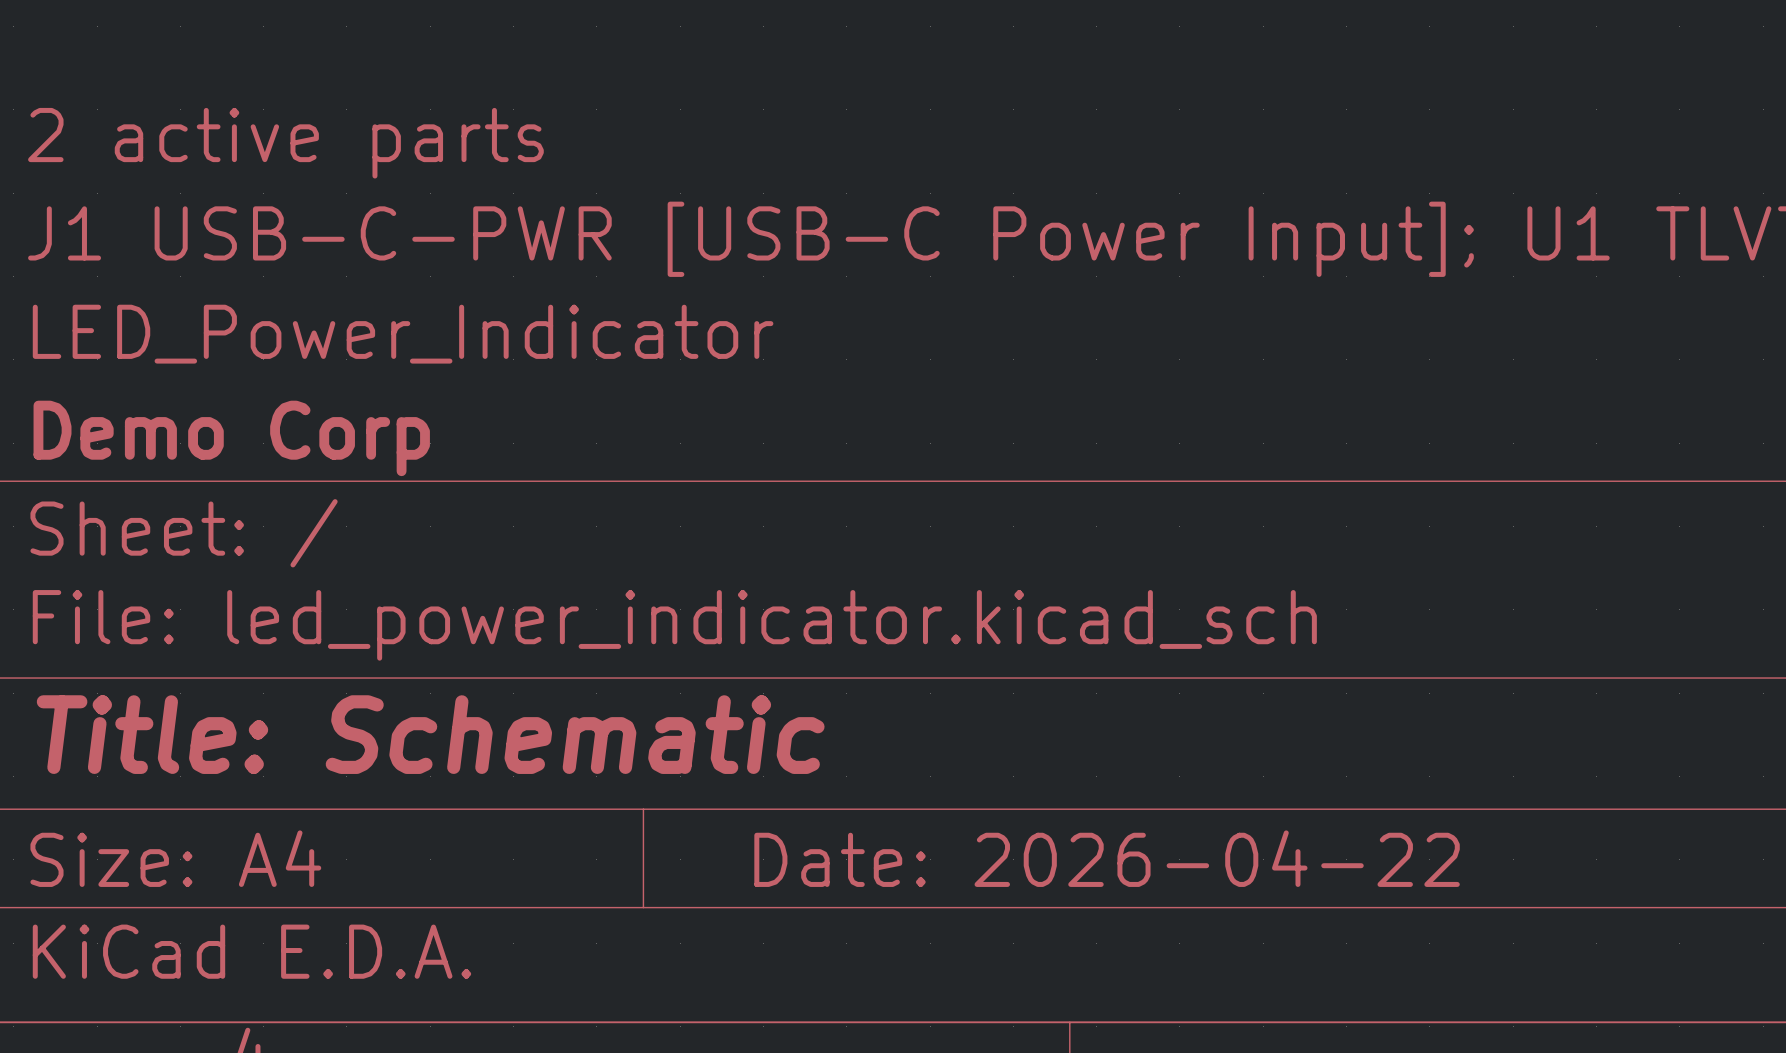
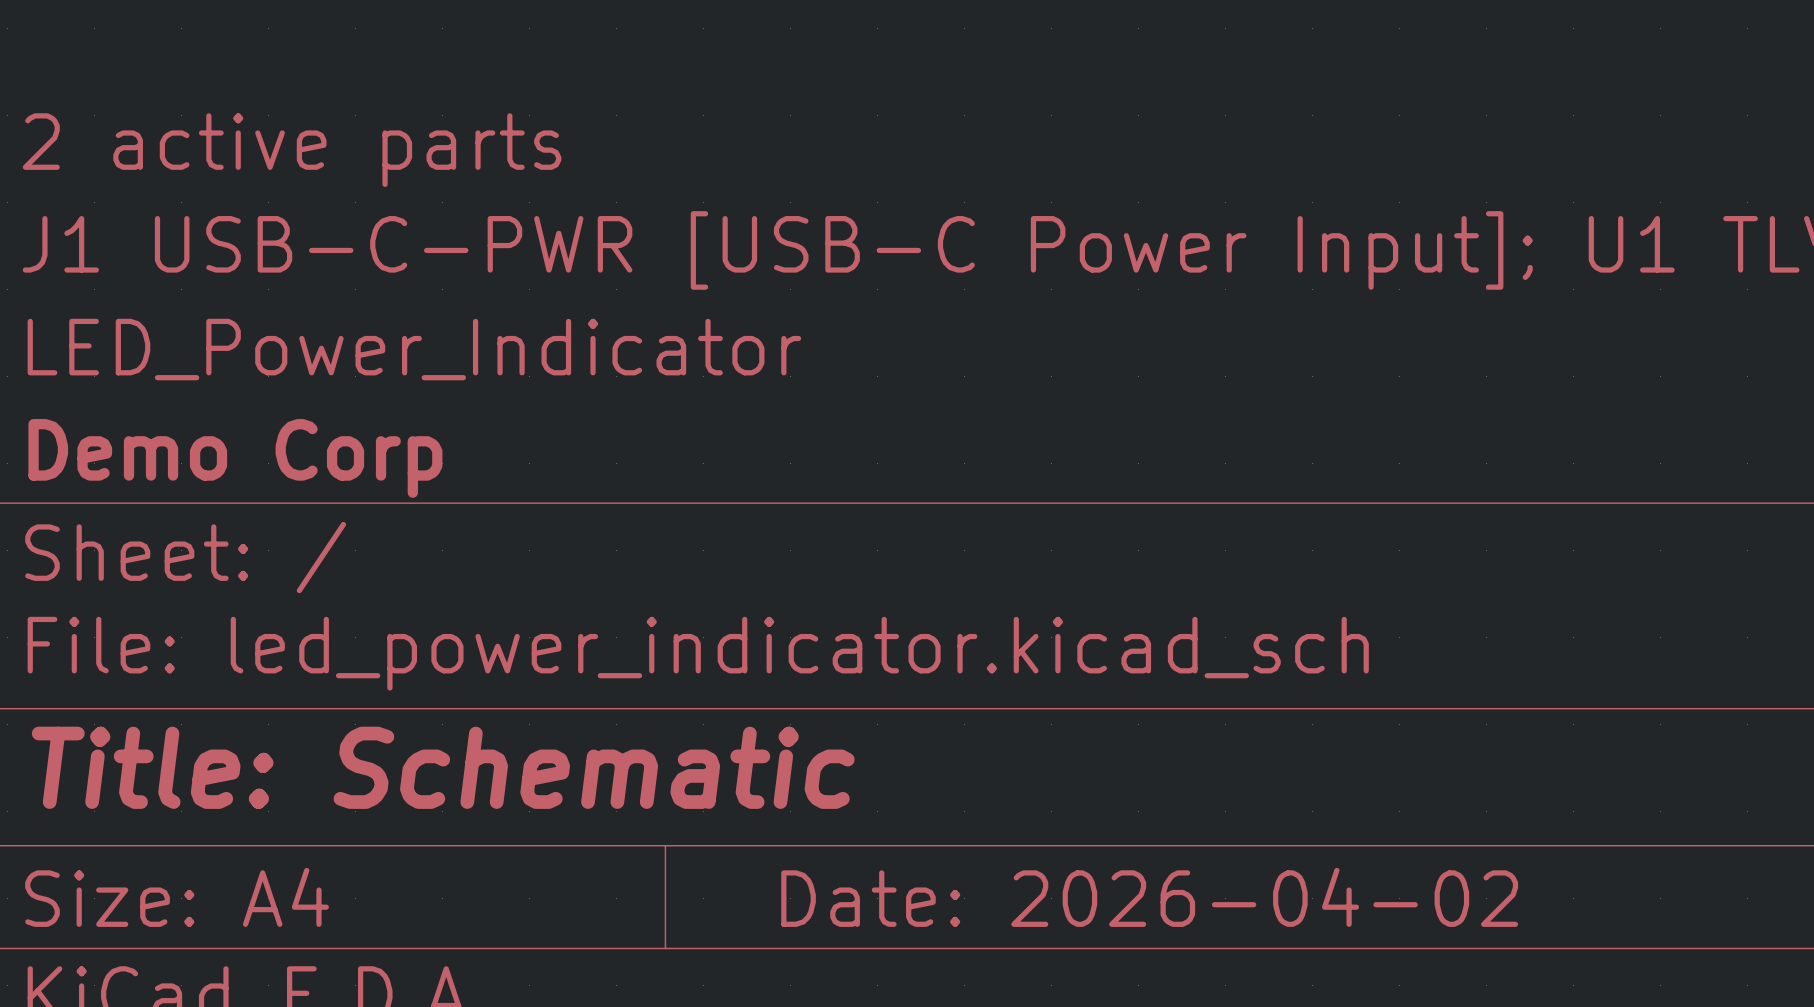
title block: Date: 2026-04-22 (1107, 858) -> Date: 2026-04-02 (1149, 897)

